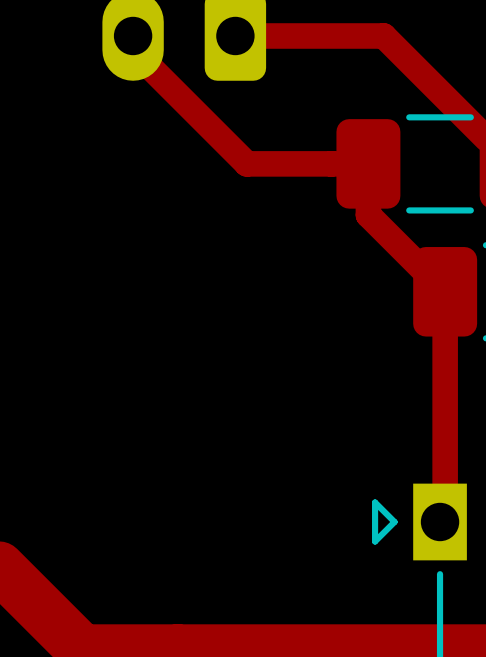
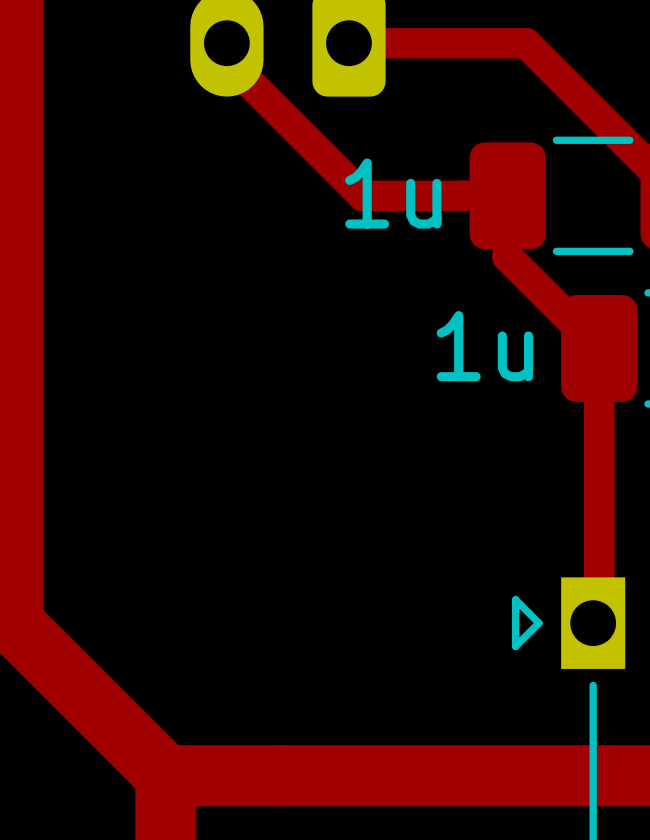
part value: none -> 1u (393, 193)
part value: none -> 1u (484, 346)

